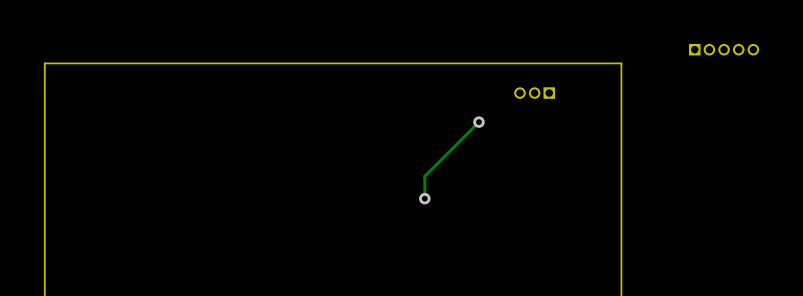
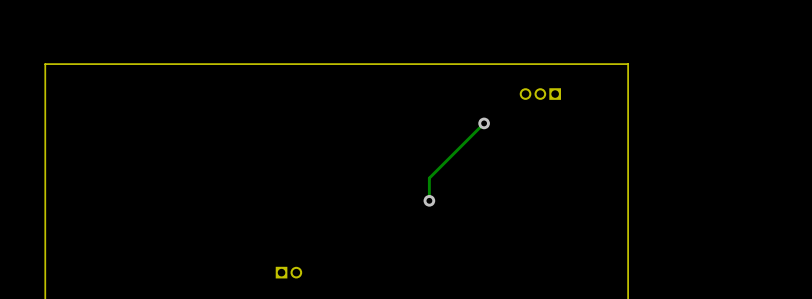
part: (724, 49) -> none
part: none -> (288, 272)

